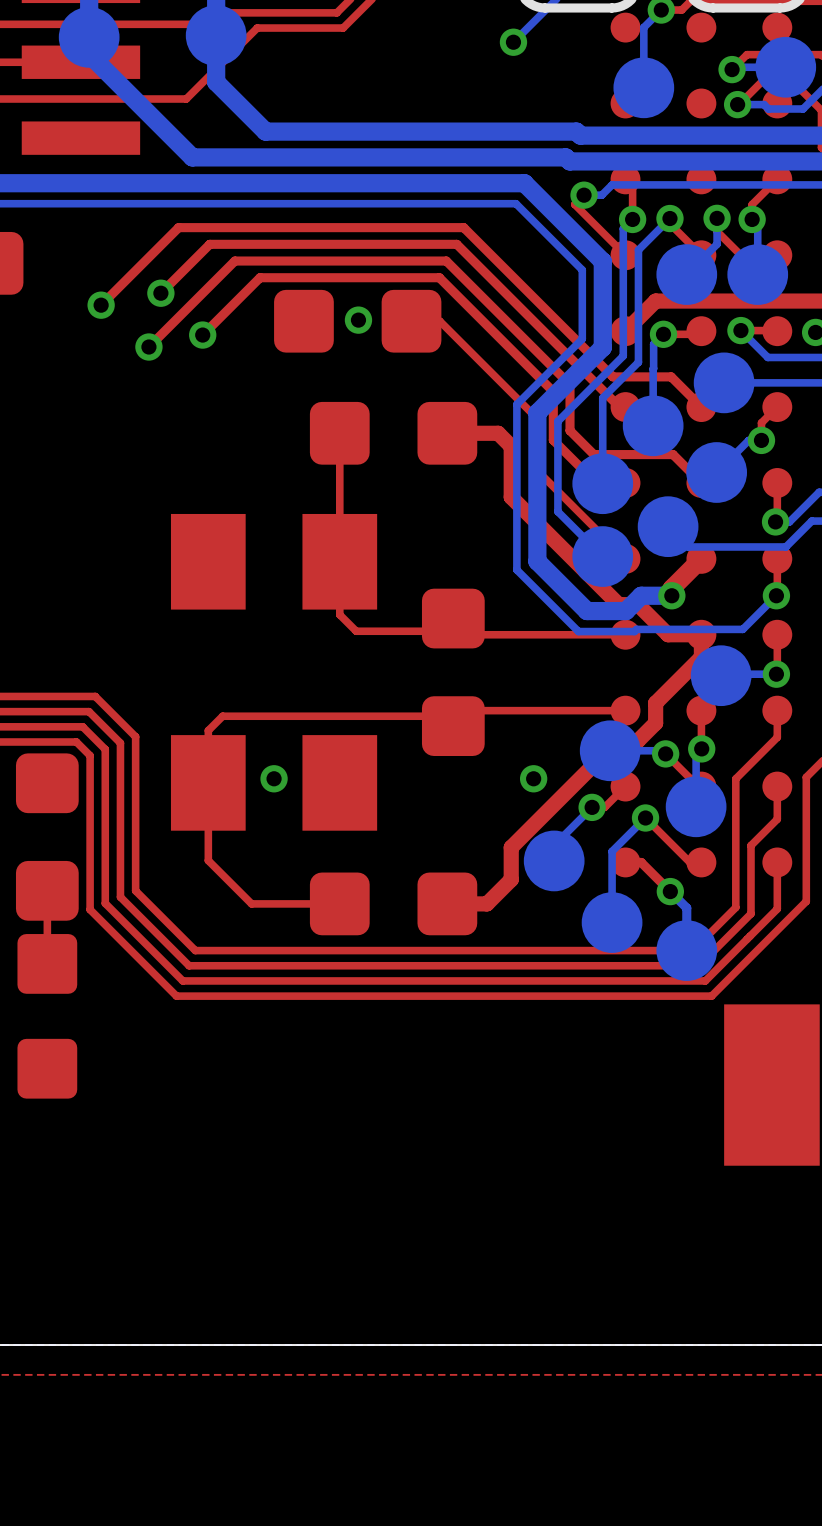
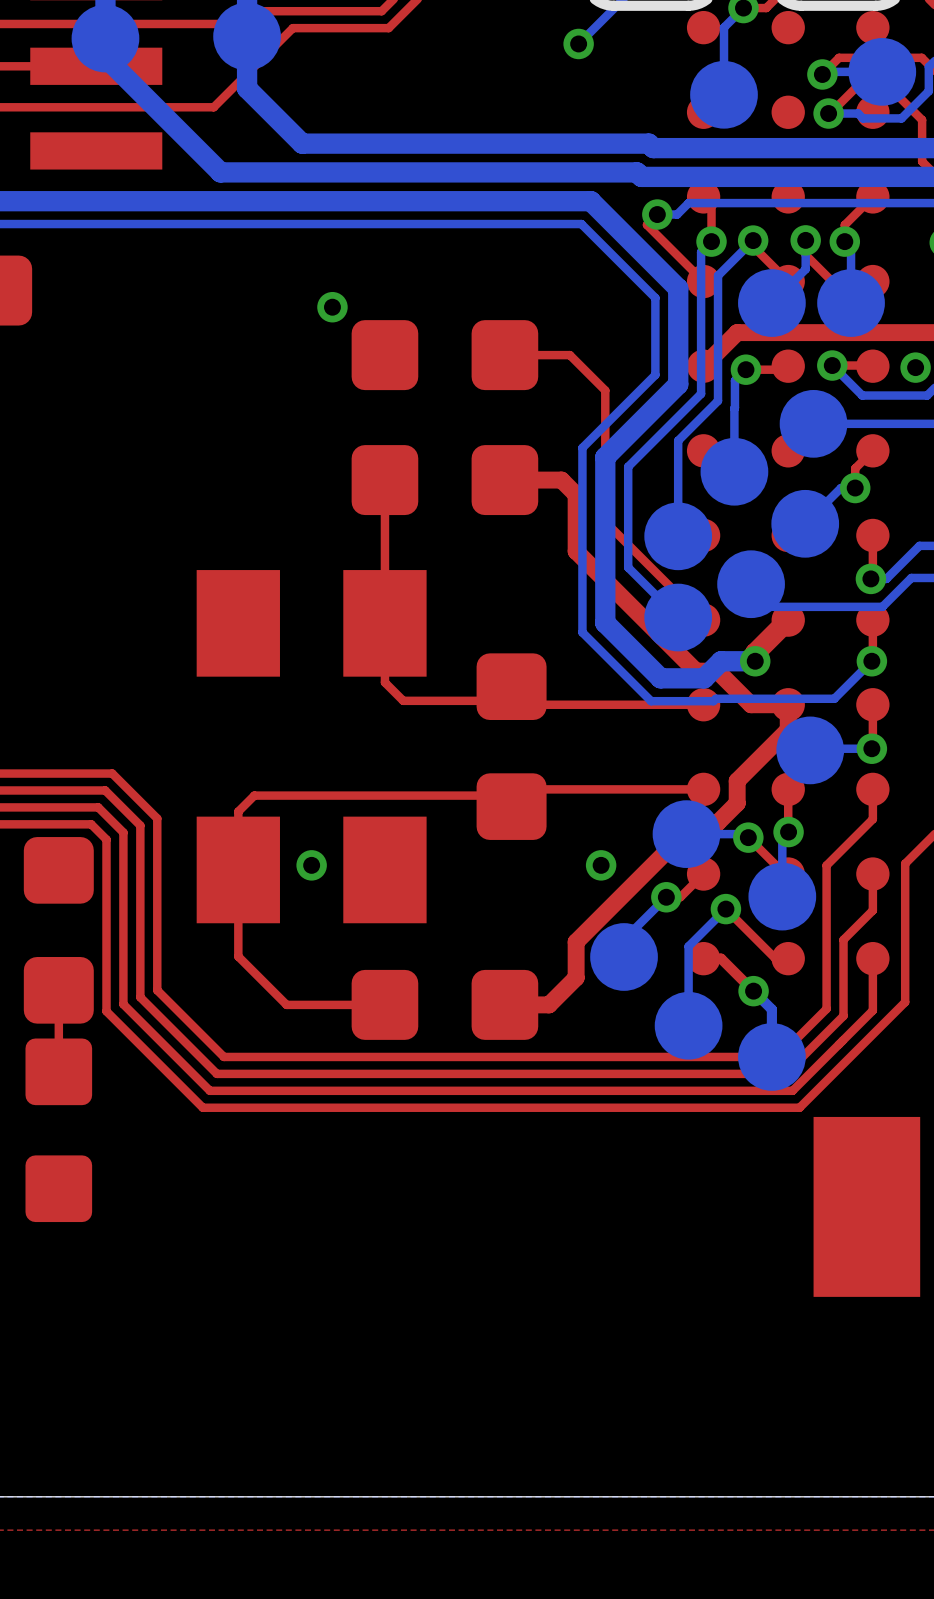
via: none -> (332, 307)
top track: (160, 293) (209, 244) (456, 244) (619, 407) (625, 407) -> none
via: (160, 293) -> none
top track: (101, 305) (178, 227) (463, 227) (612, 376) (671, 376) (701, 407) -> none
via: (101, 305) -> none
via: (358, 320) -> none
part position: (357, 321) -> (444, 355)
top track: (411, 321) (439, 321) (537, 418) -> (504, 355) (569, 355) (605, 390) (605, 463)
top track: (202, 335) (260, 277) (439, 277) (553, 391) (553, 440) (591, 478) (621, 478) (625, 482) -> none
via: (202, 335) -> none
top track: (148, 347) (234, 261) (446, 261) (570, 384) (570, 430) (593, 454) (673, 454) (701, 482) -> none
via: (148, 347) -> none

